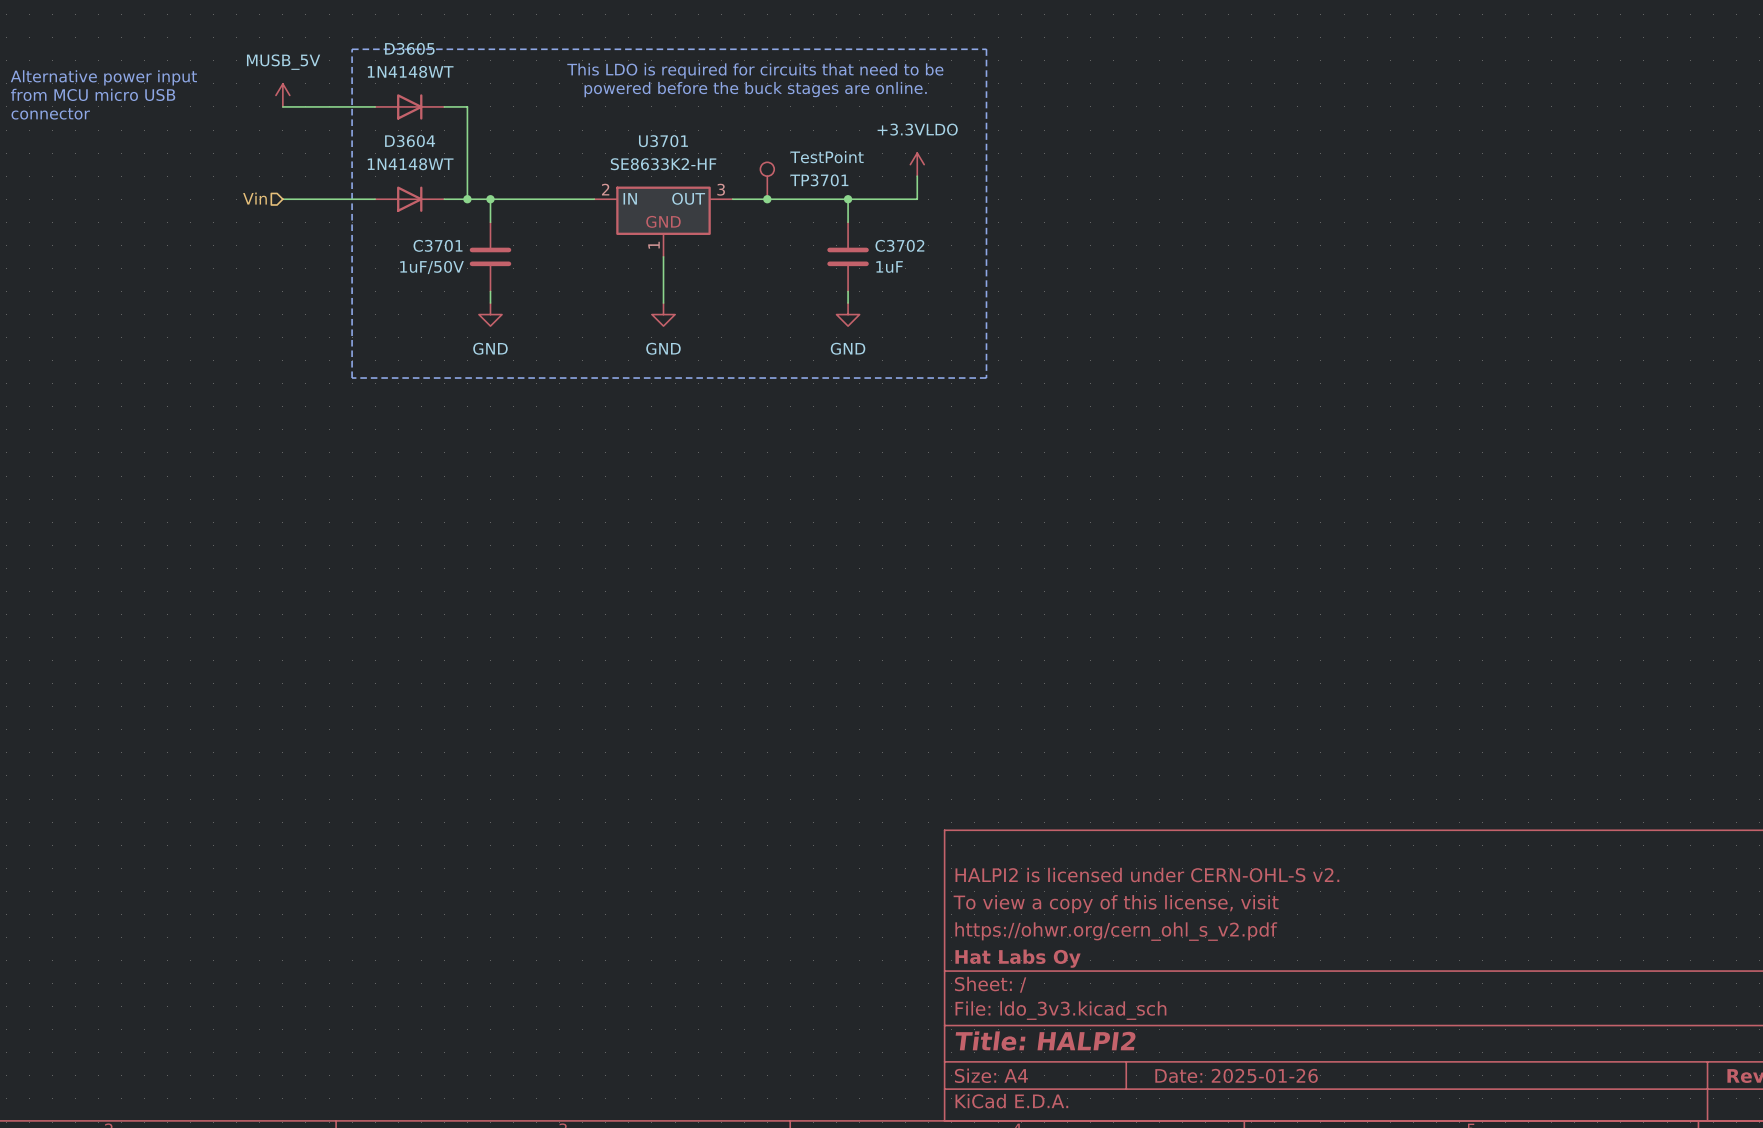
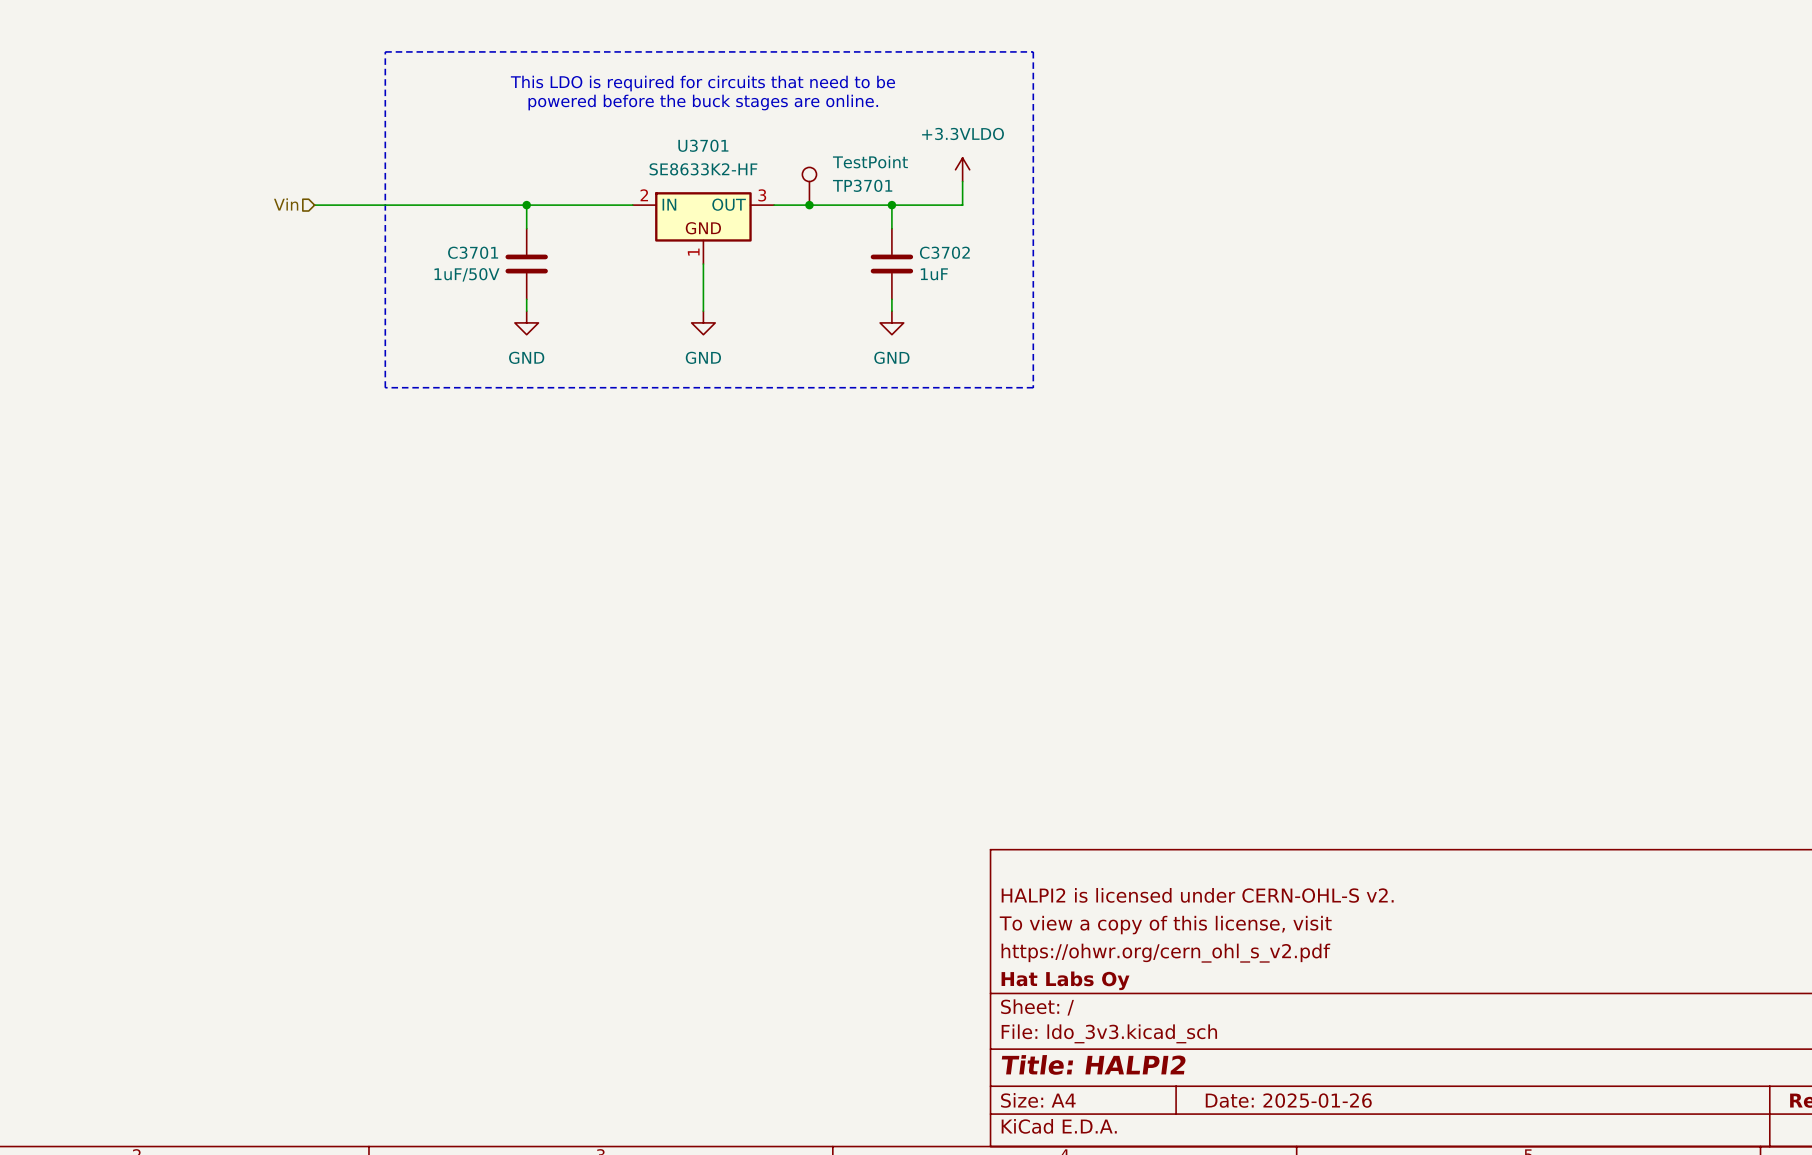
text position: This LDO is required for circuits that need to be (755, 70) -> This LDO is required for circuits that need to be (702, 83)
text: Alternative power input (103, 77) -> none
text position: powered before the buck stages are online. (755, 89) -> powered before the buck stages are online. (703, 102)
text: from MCU micro USB (93, 94) -> none
power symbol: MUSB_5V (282, 95) -> none
wire: (282, 106) (375, 106) -> none
D3605: 1N4148WT (409, 106) -> none
wire: (444, 106) (467, 106) (467, 199) -> none
text: connector (50, 113) -> none
D3604: 1N4148WT (409, 199) -> none
junction: (467, 199) -> none

